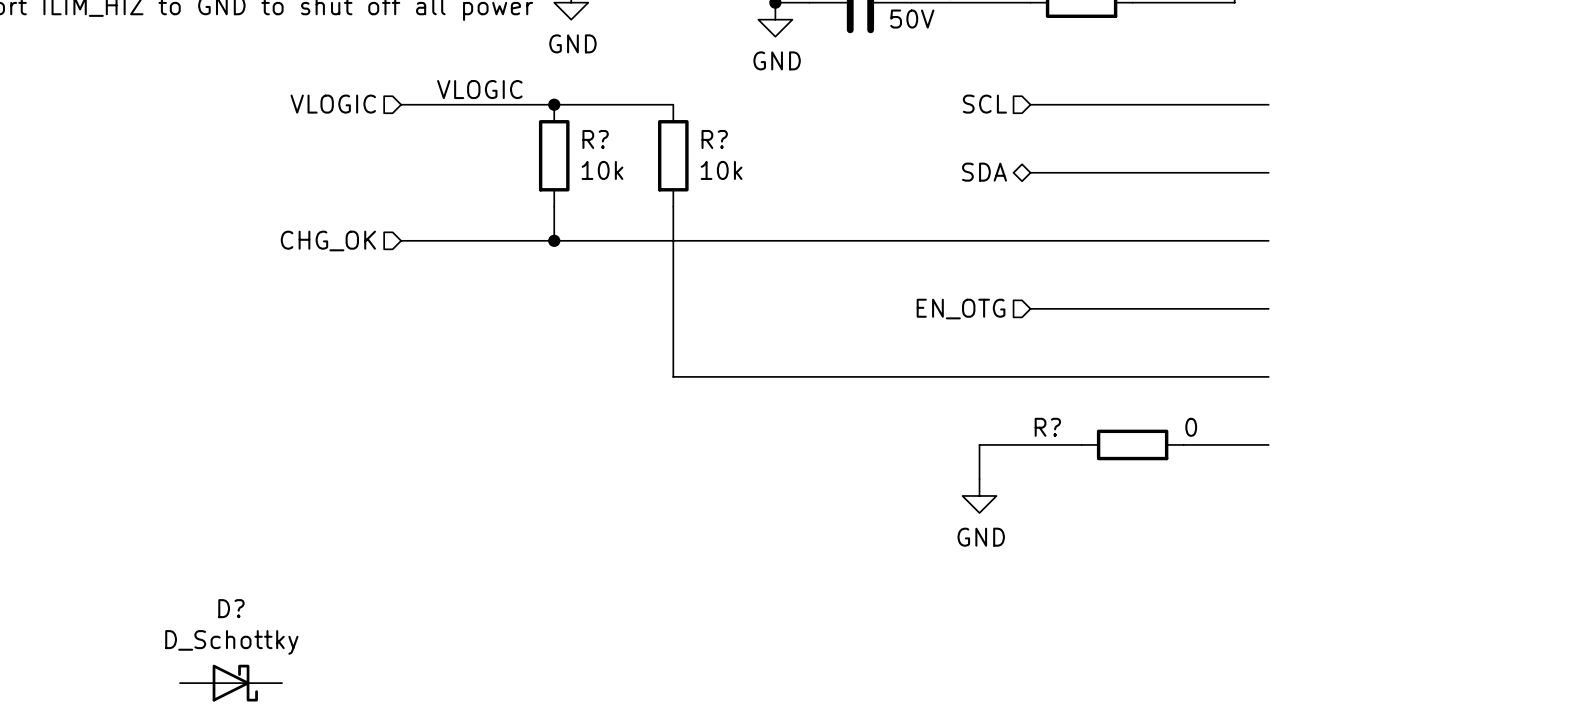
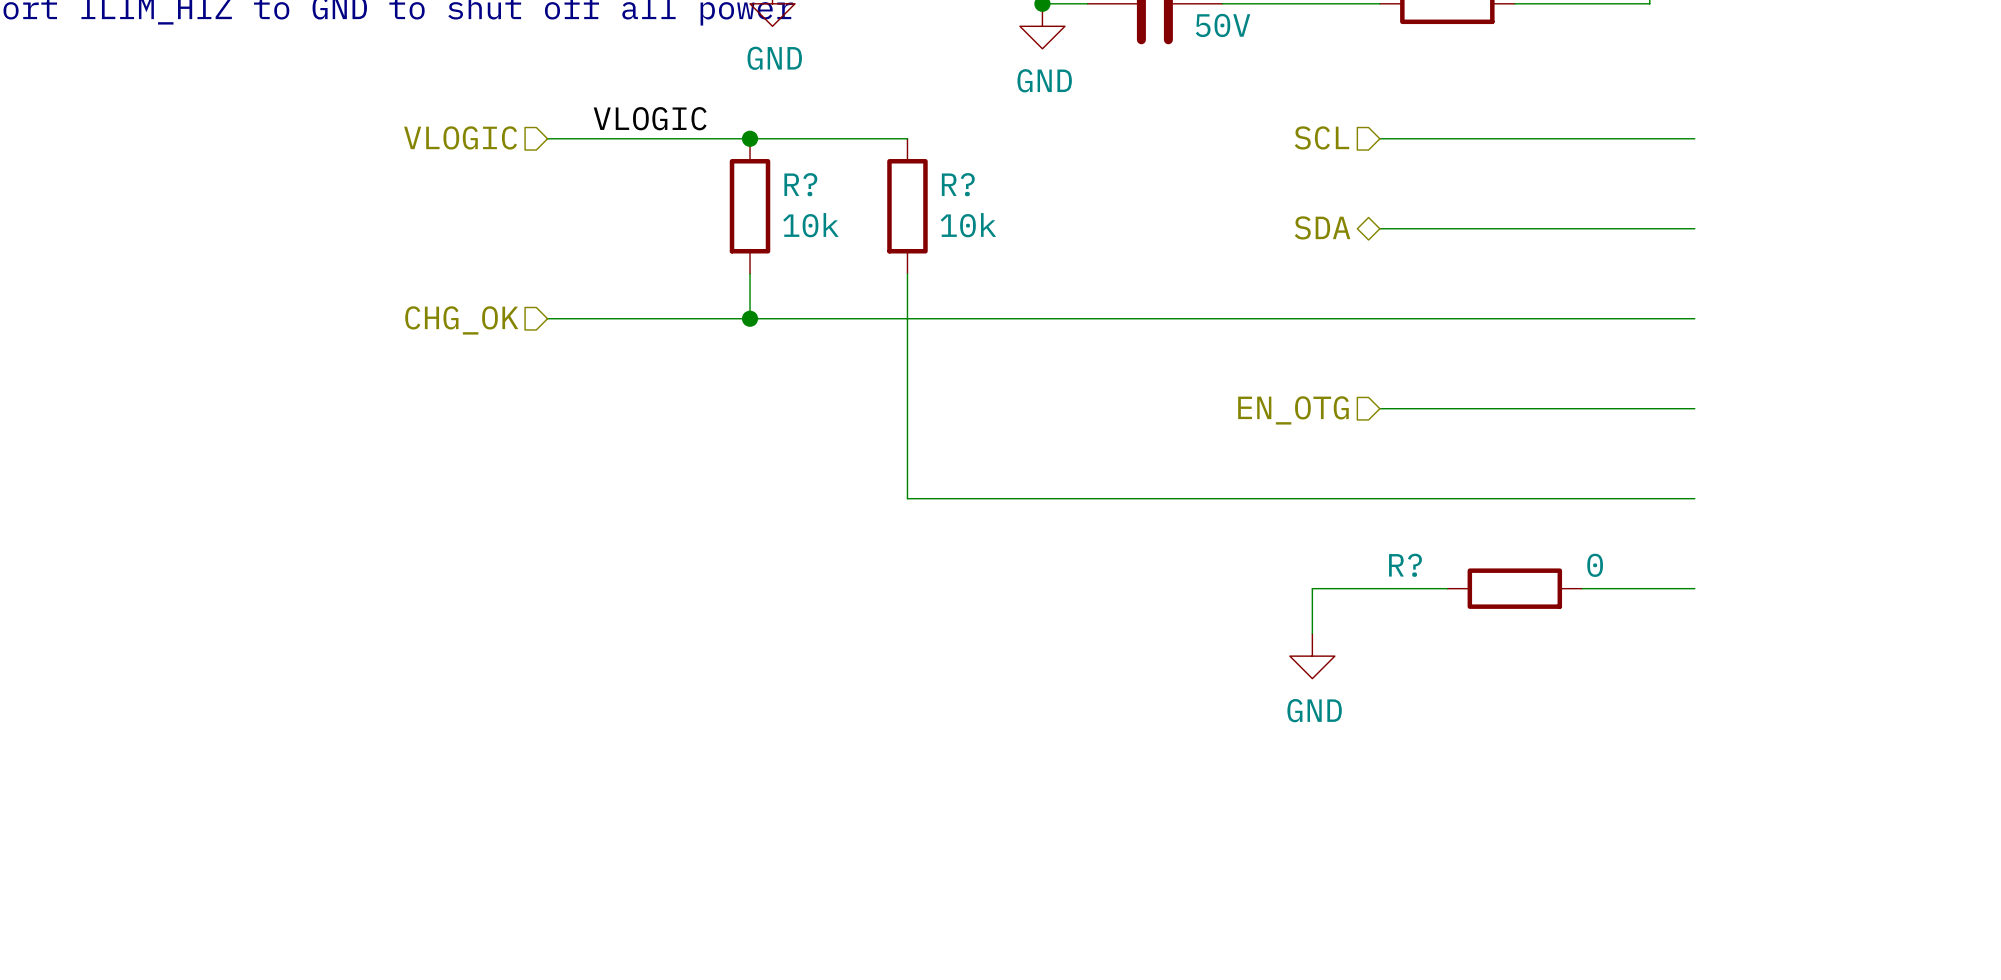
D?: D_Schottky (231, 683) -> none

